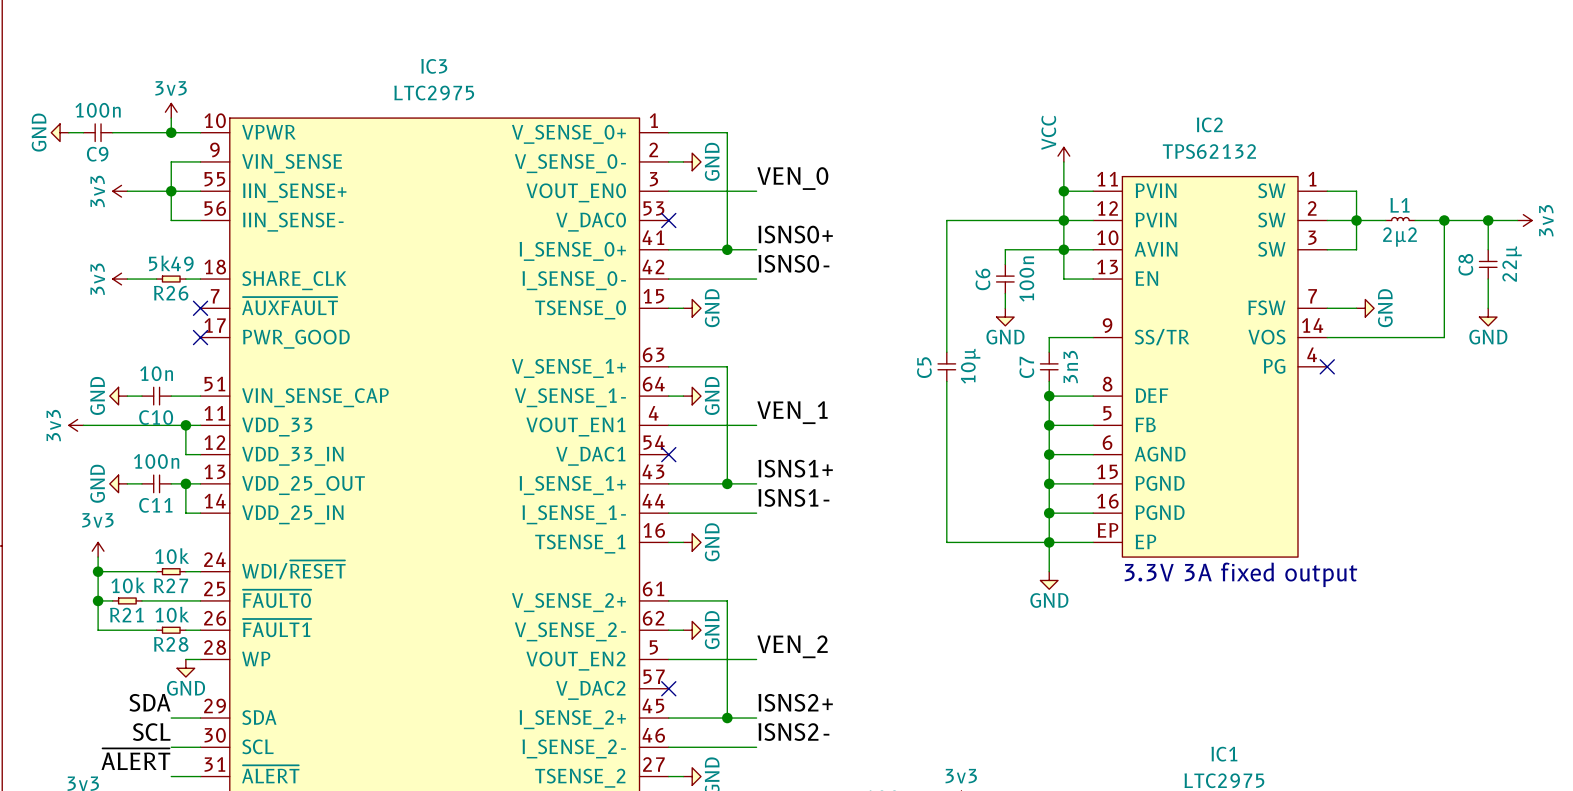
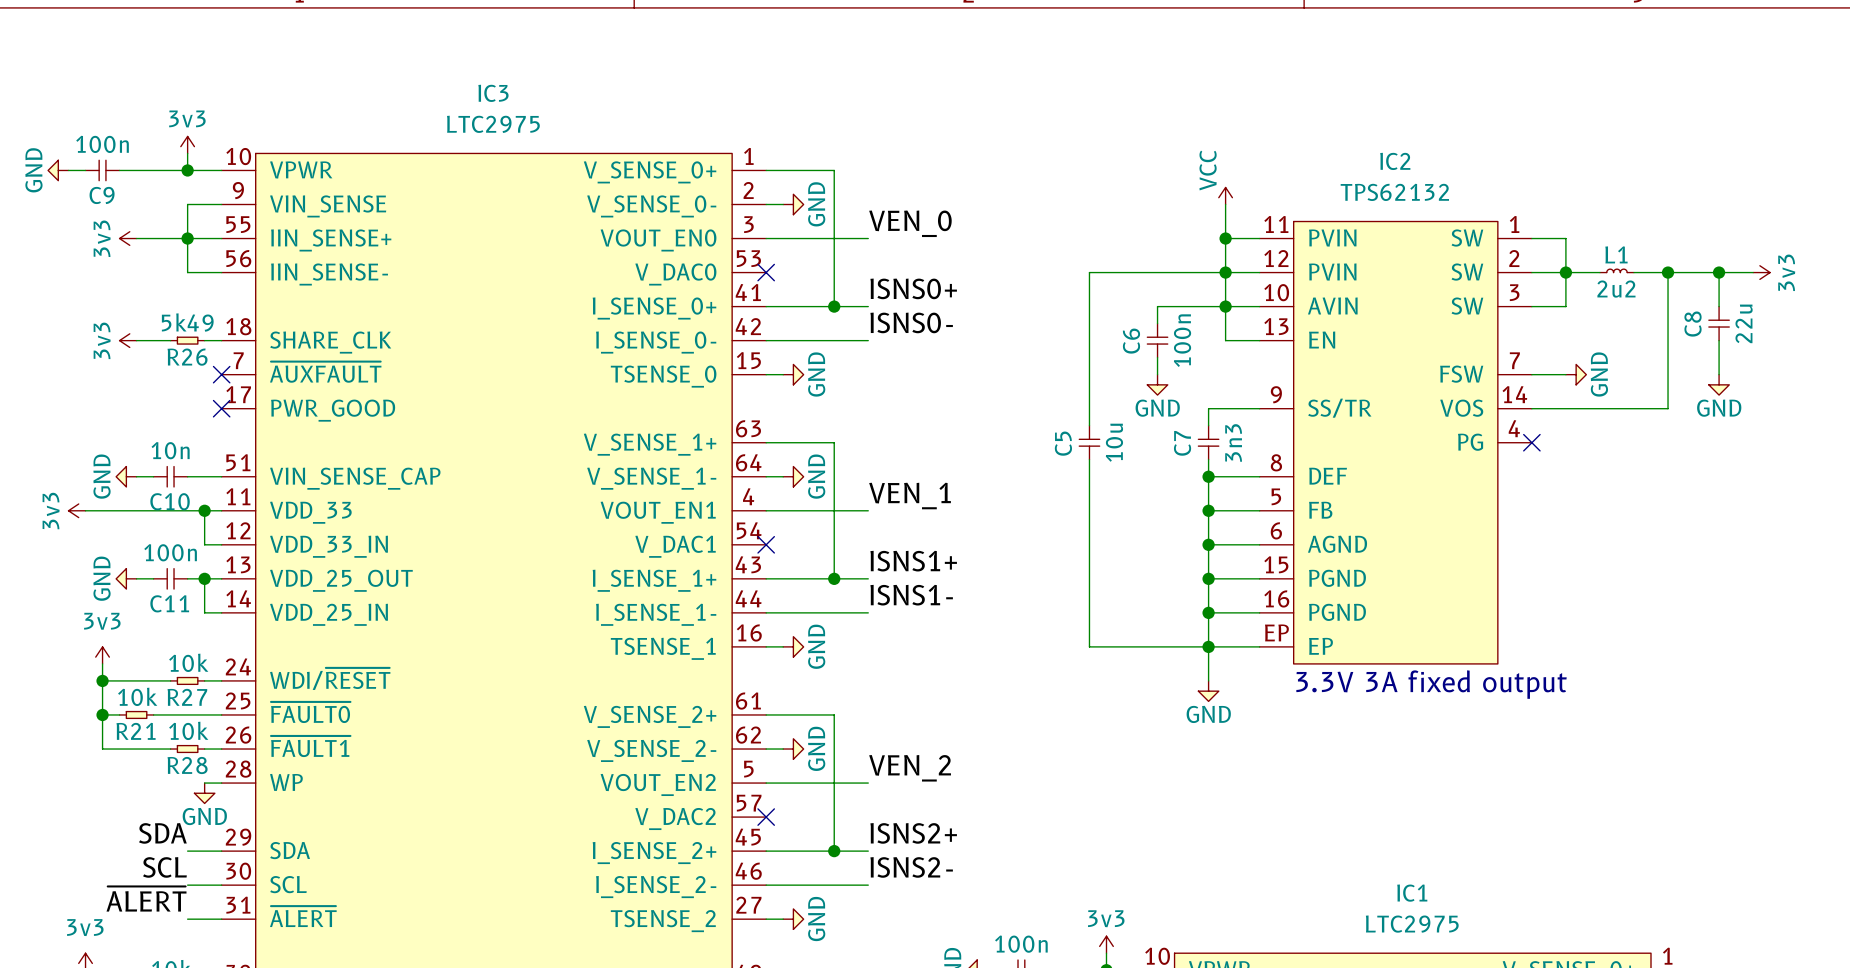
L1 value: 2µ2 (1399, 237) -> 2u2 (1616, 289)
C8 value: 22µ (1512, 263) -> 22u (1744, 323)
C5 value: 10µ (970, 366) -> 10u (1114, 442)

